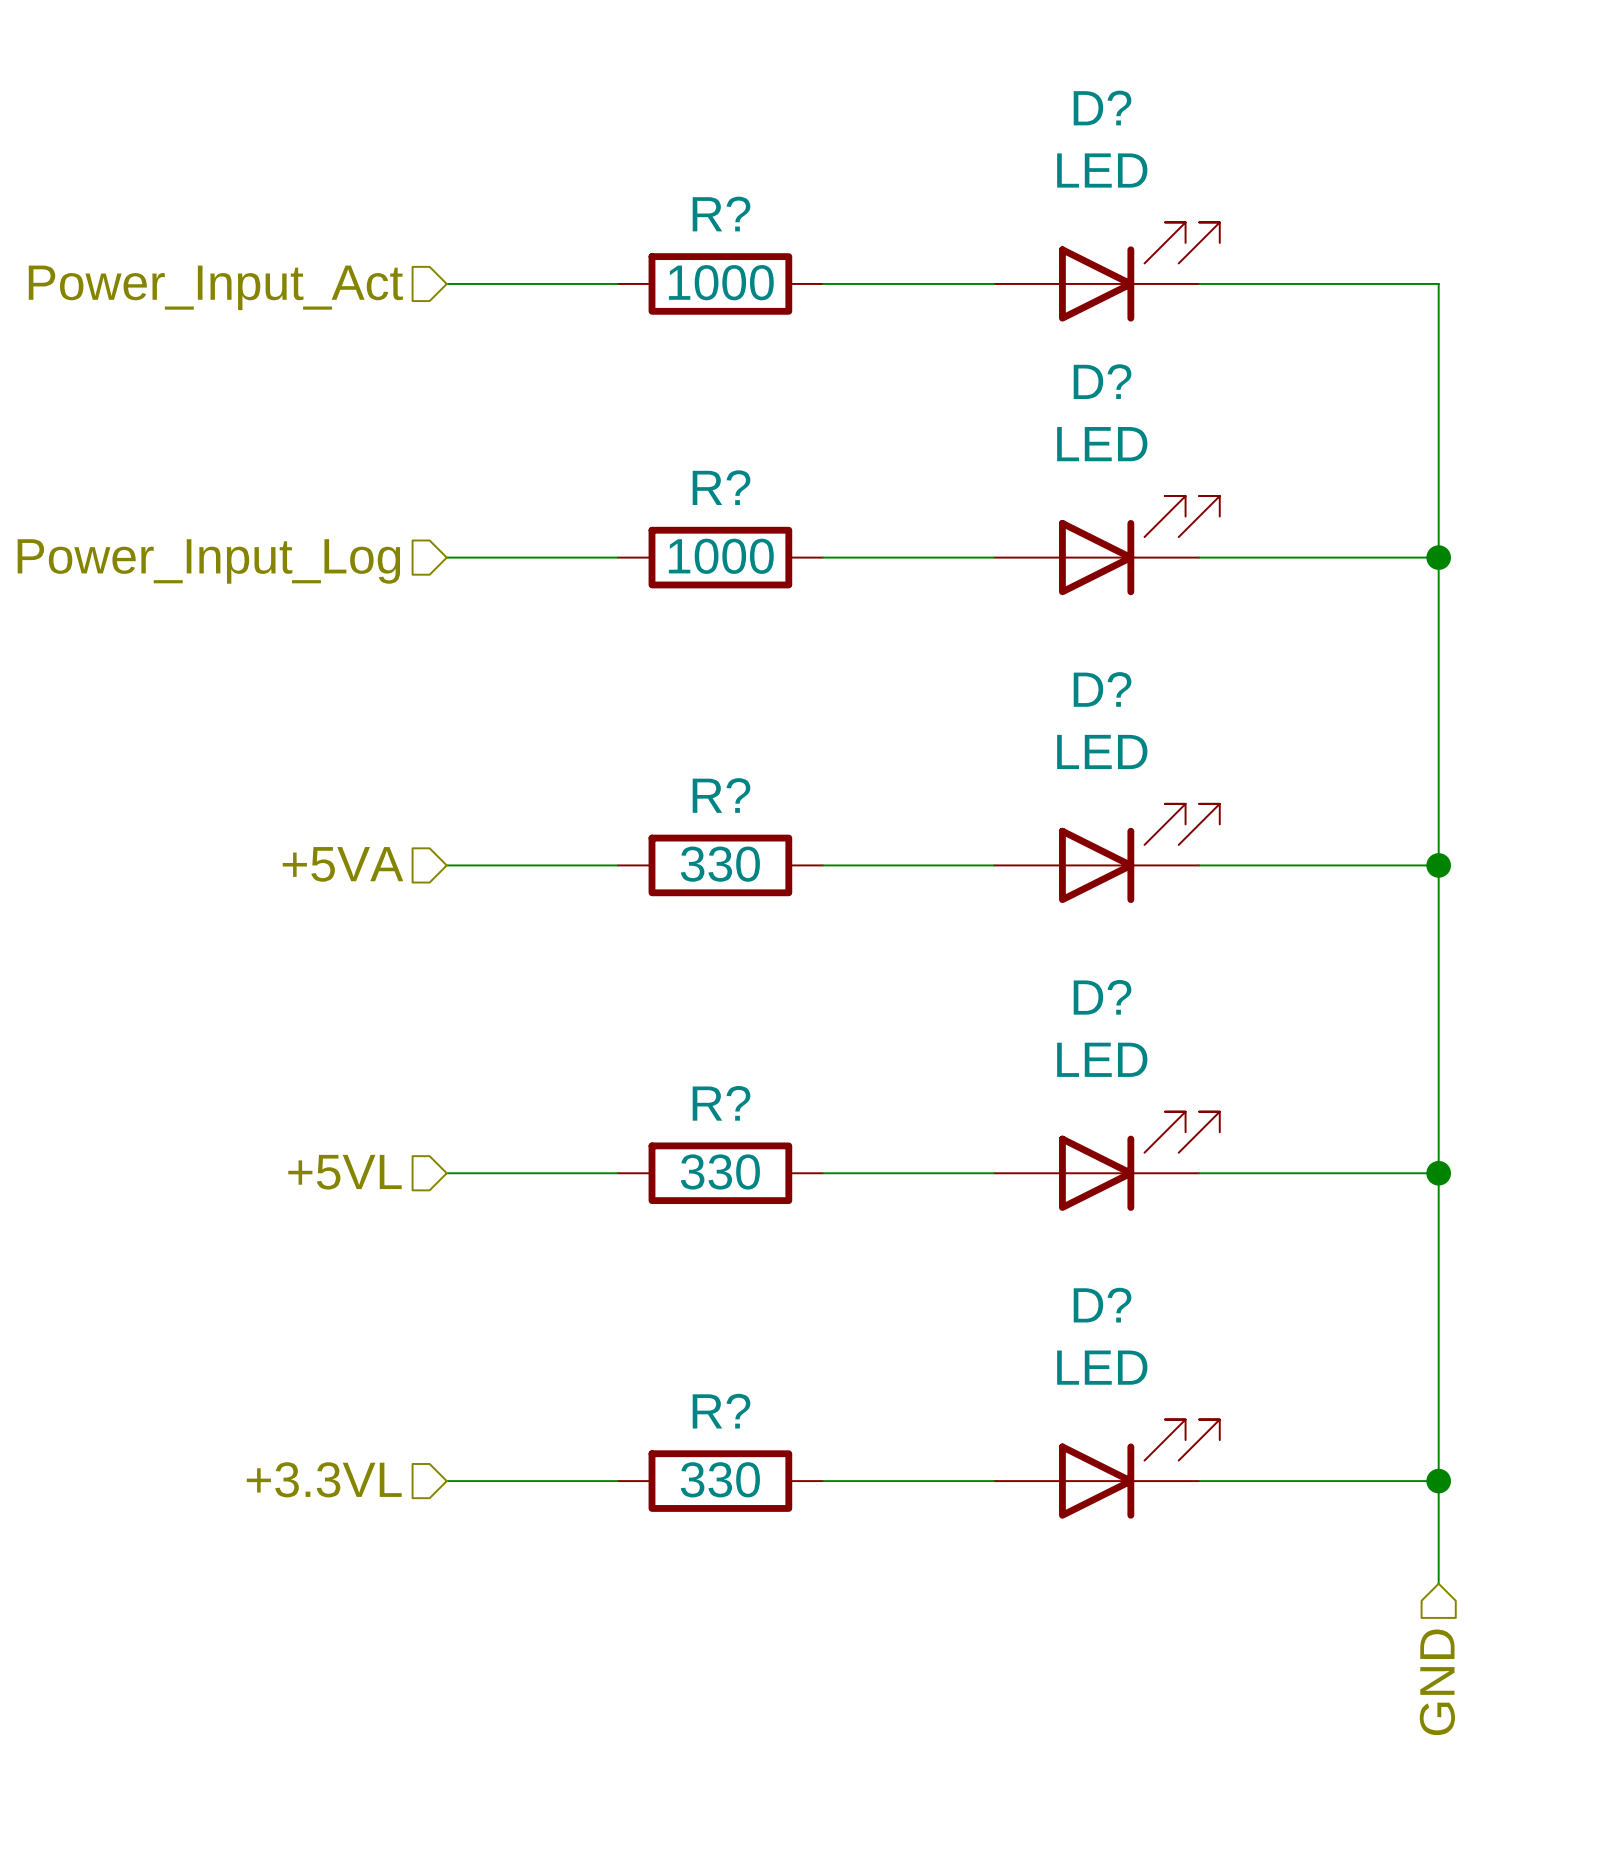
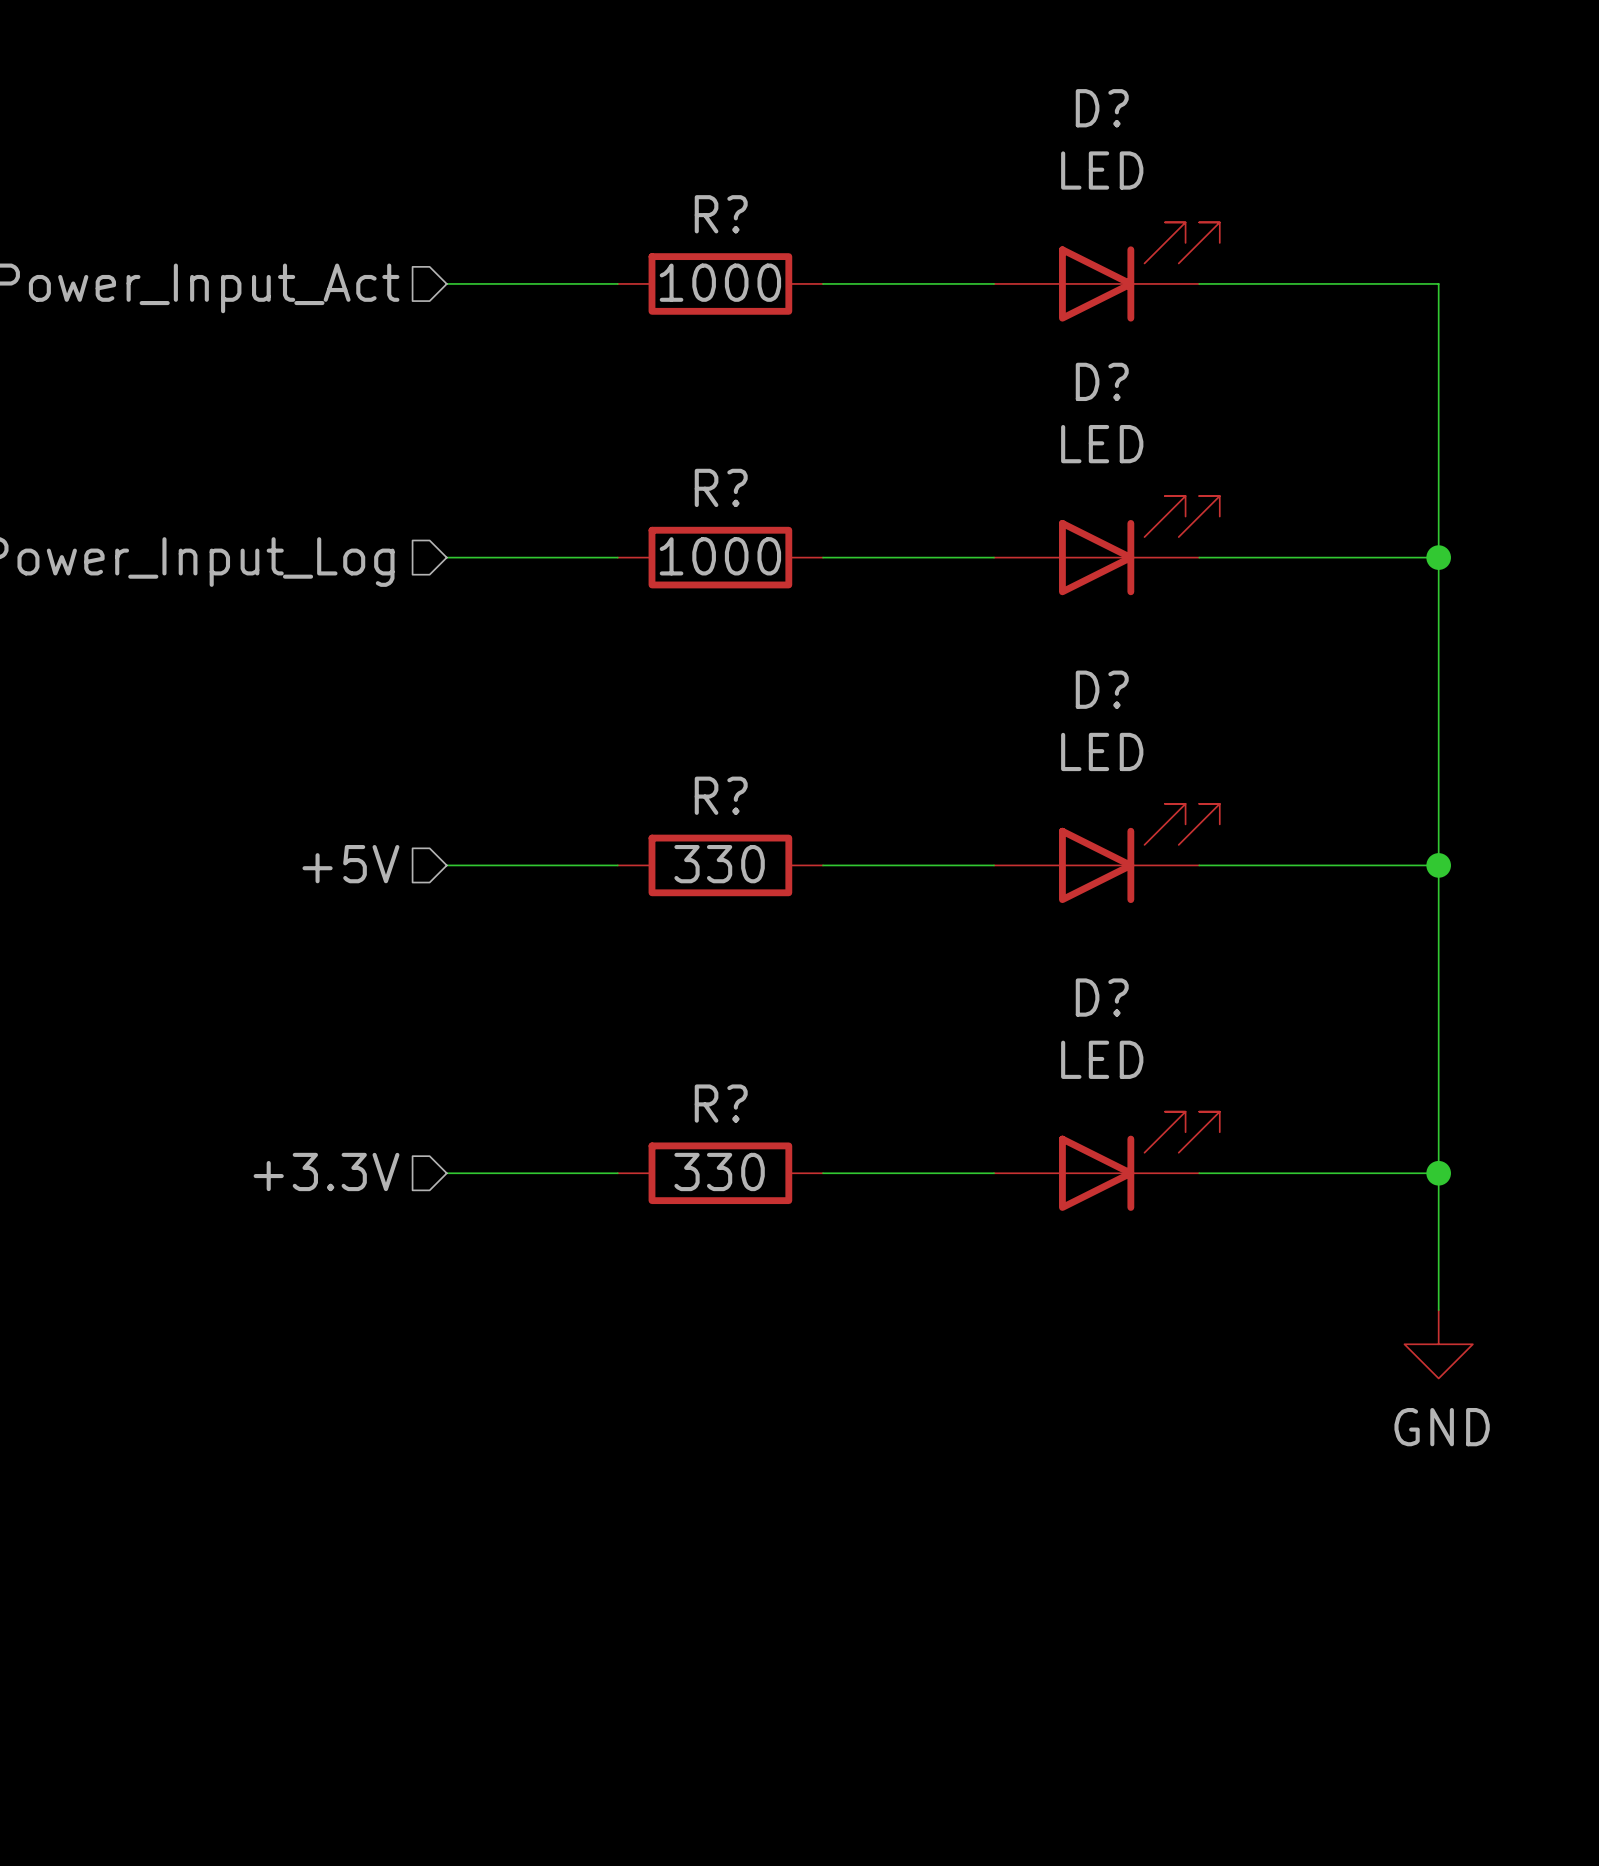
hierarchical label: +5VA (342, 864) -> +5V (350, 864)
hierarchical label: +5VL (344, 1172) -> +3.3V (326, 1171)
wire: (1438, 1310) (1438, 1583) -> none
power symbol: none -> GND (1438, 1344)
D?: LED (1106, 1469) -> none
hierarchical label: +3.3VL (324, 1479) -> none
wire: (446, 1481) (617, 1481) -> none
R?: 330 (720, 1481) -> none
wire: (823, 1481) (994, 1481) -> none
wire: (1199, 1481) (1438, 1481) -> none
junction: (1438, 1481) -> none
hierarchical label: GND (1437, 1682) -> none

